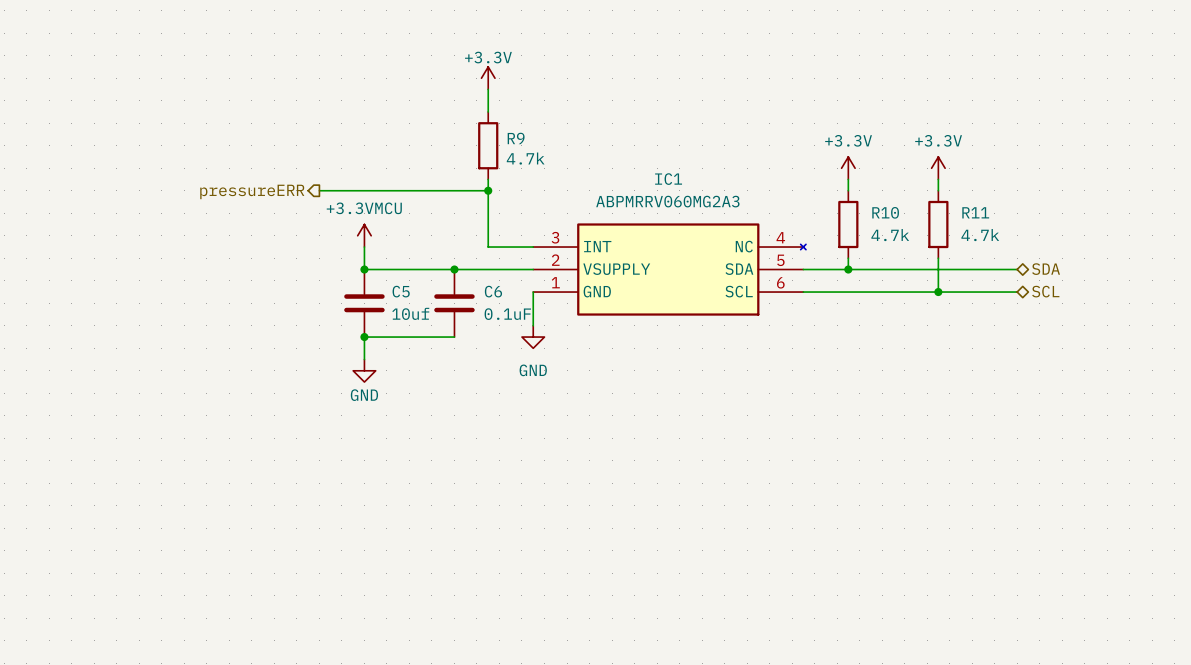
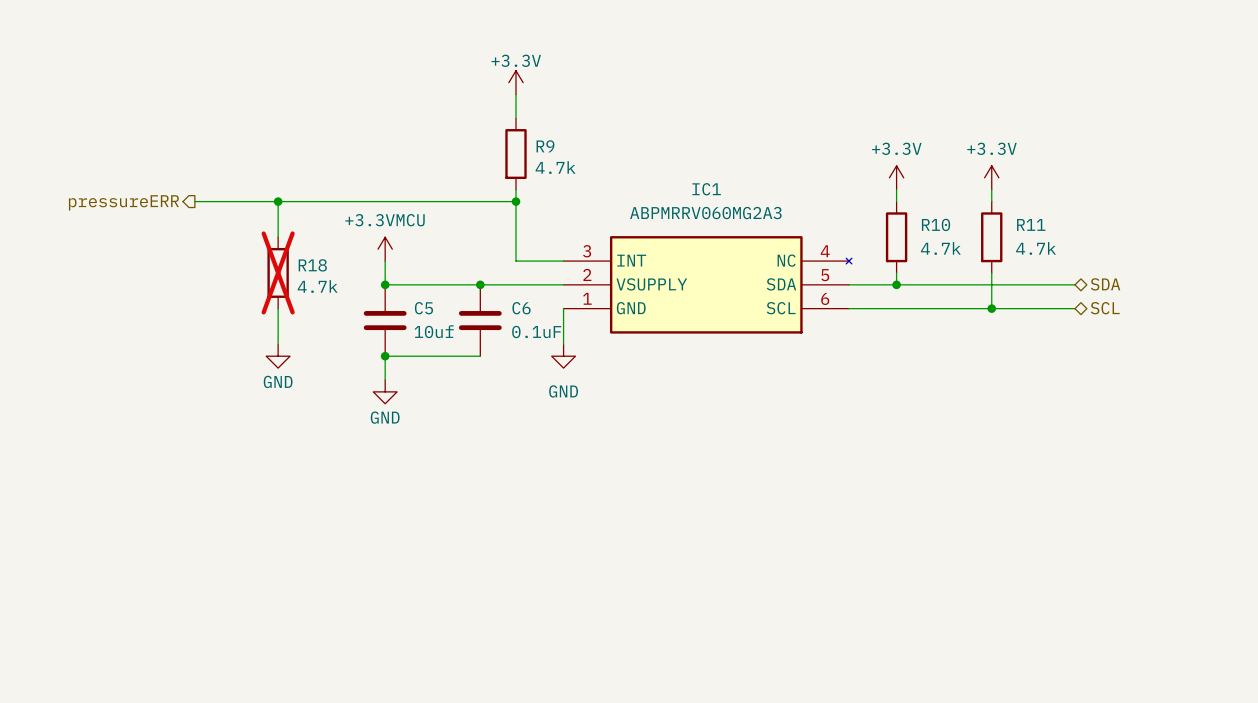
wire: none -> (194, 201) (337, 201)
wire: none -> (278, 201) (278, 237)
junction: none -> (278, 201)
hierarchical label position: pressureERR (252, 191) -> pressureERR (123, 202)
R18: none -> 4.7k (278, 272)
wire: none -> (278, 308) (278, 344)
power symbol: none -> GND (278, 356)

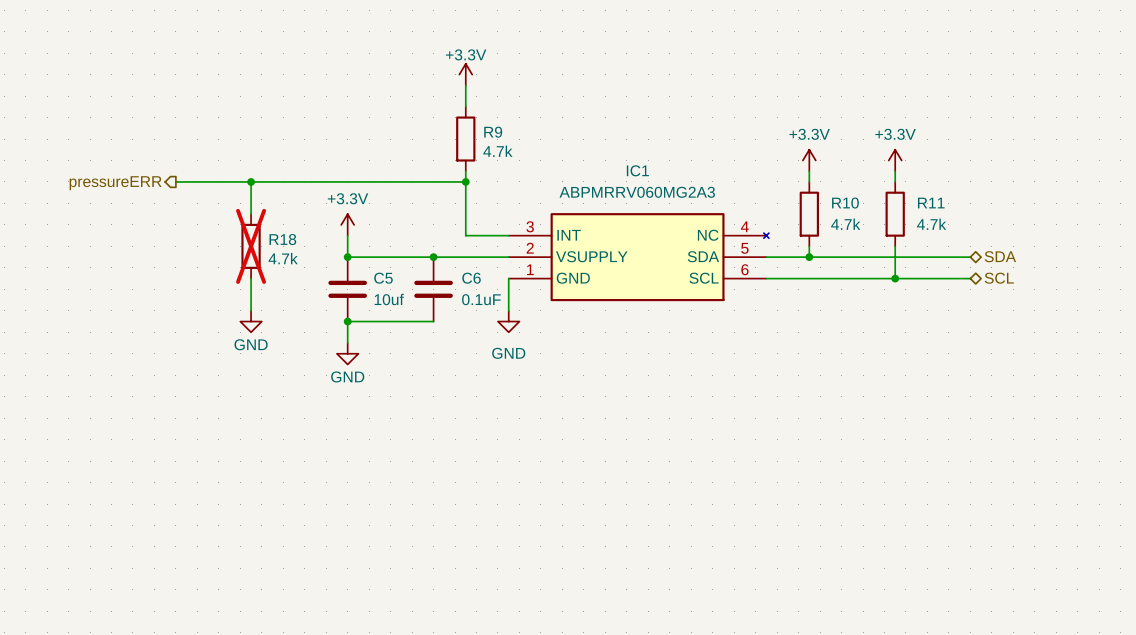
power symbol: +3.3VMCU (385, 249) -> +3.3V (347, 224)

